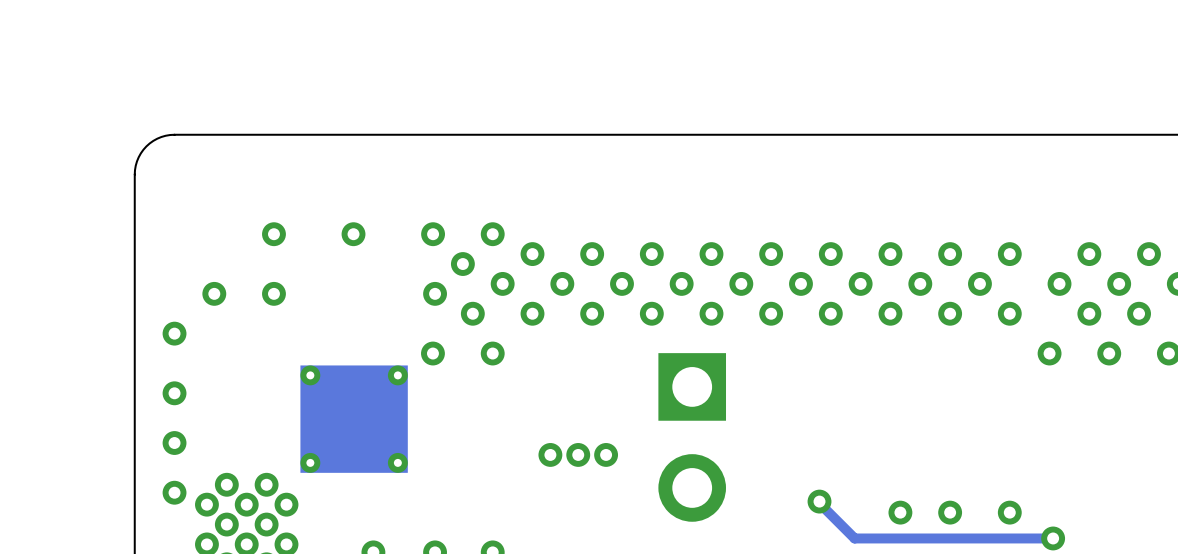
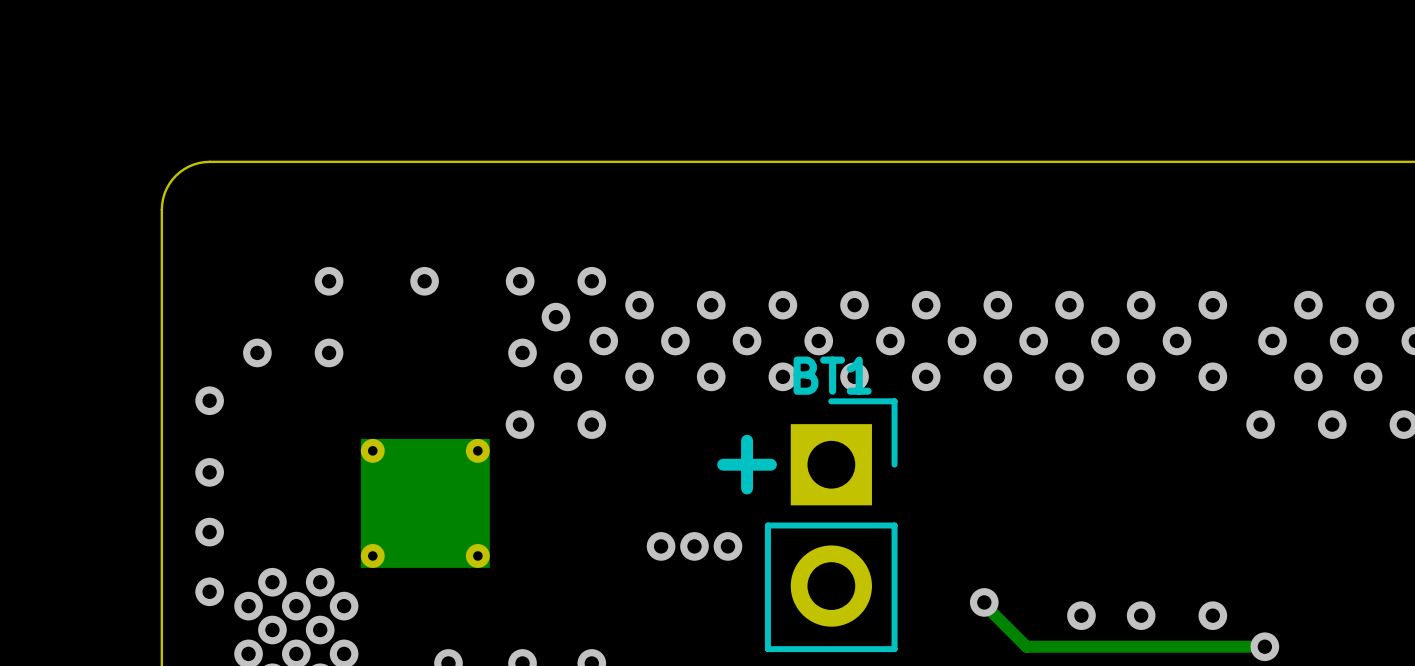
text: none -> BT1 (832, 375)
line: none -> (831, 401) (894, 401) (894, 464)
line: none -> (747, 440) (747, 488)
line: none -> (770, 464) (723, 464)
line: none -> (894, 525) (767, 525) (767, 649) (894, 649) (894, 525)

